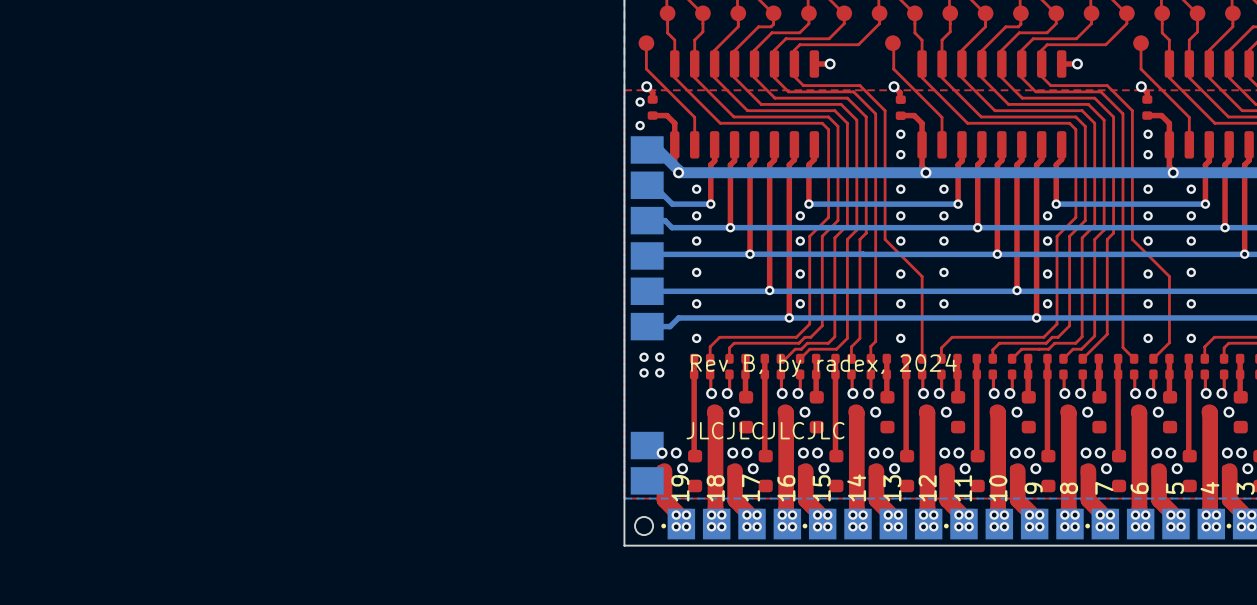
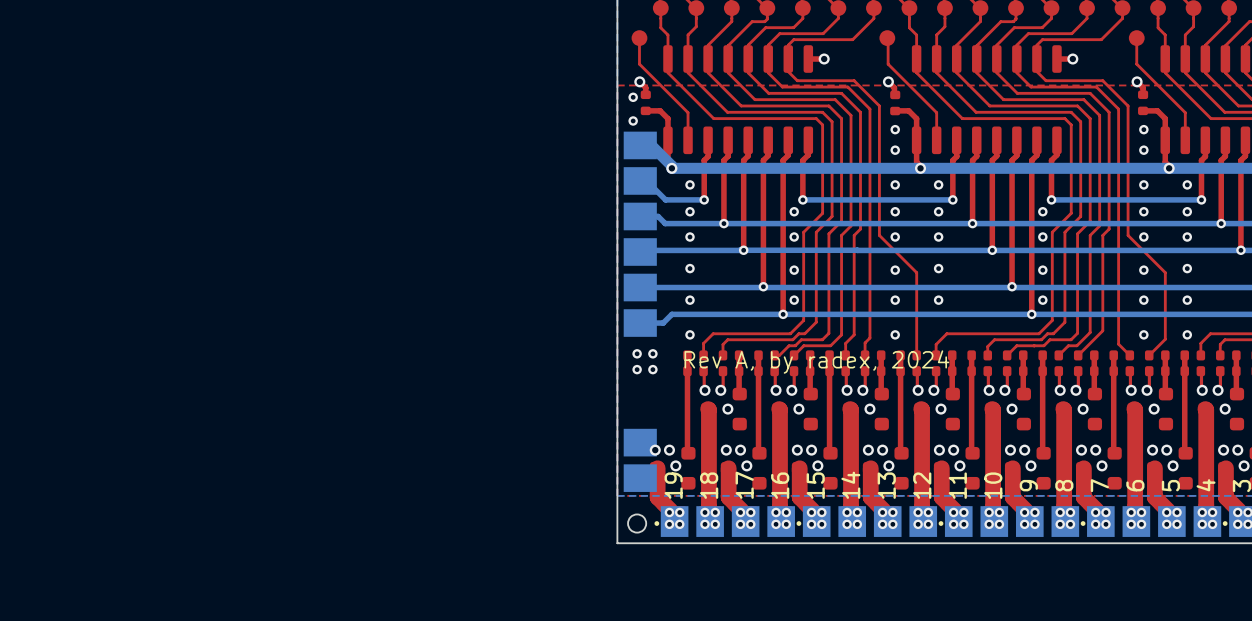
text: Rev B, by radex, 2024 (823, 365) -> Rev A, by radex, 2024 (816, 362)
text: JLCJLCJLCJLC (765, 430) -> none

